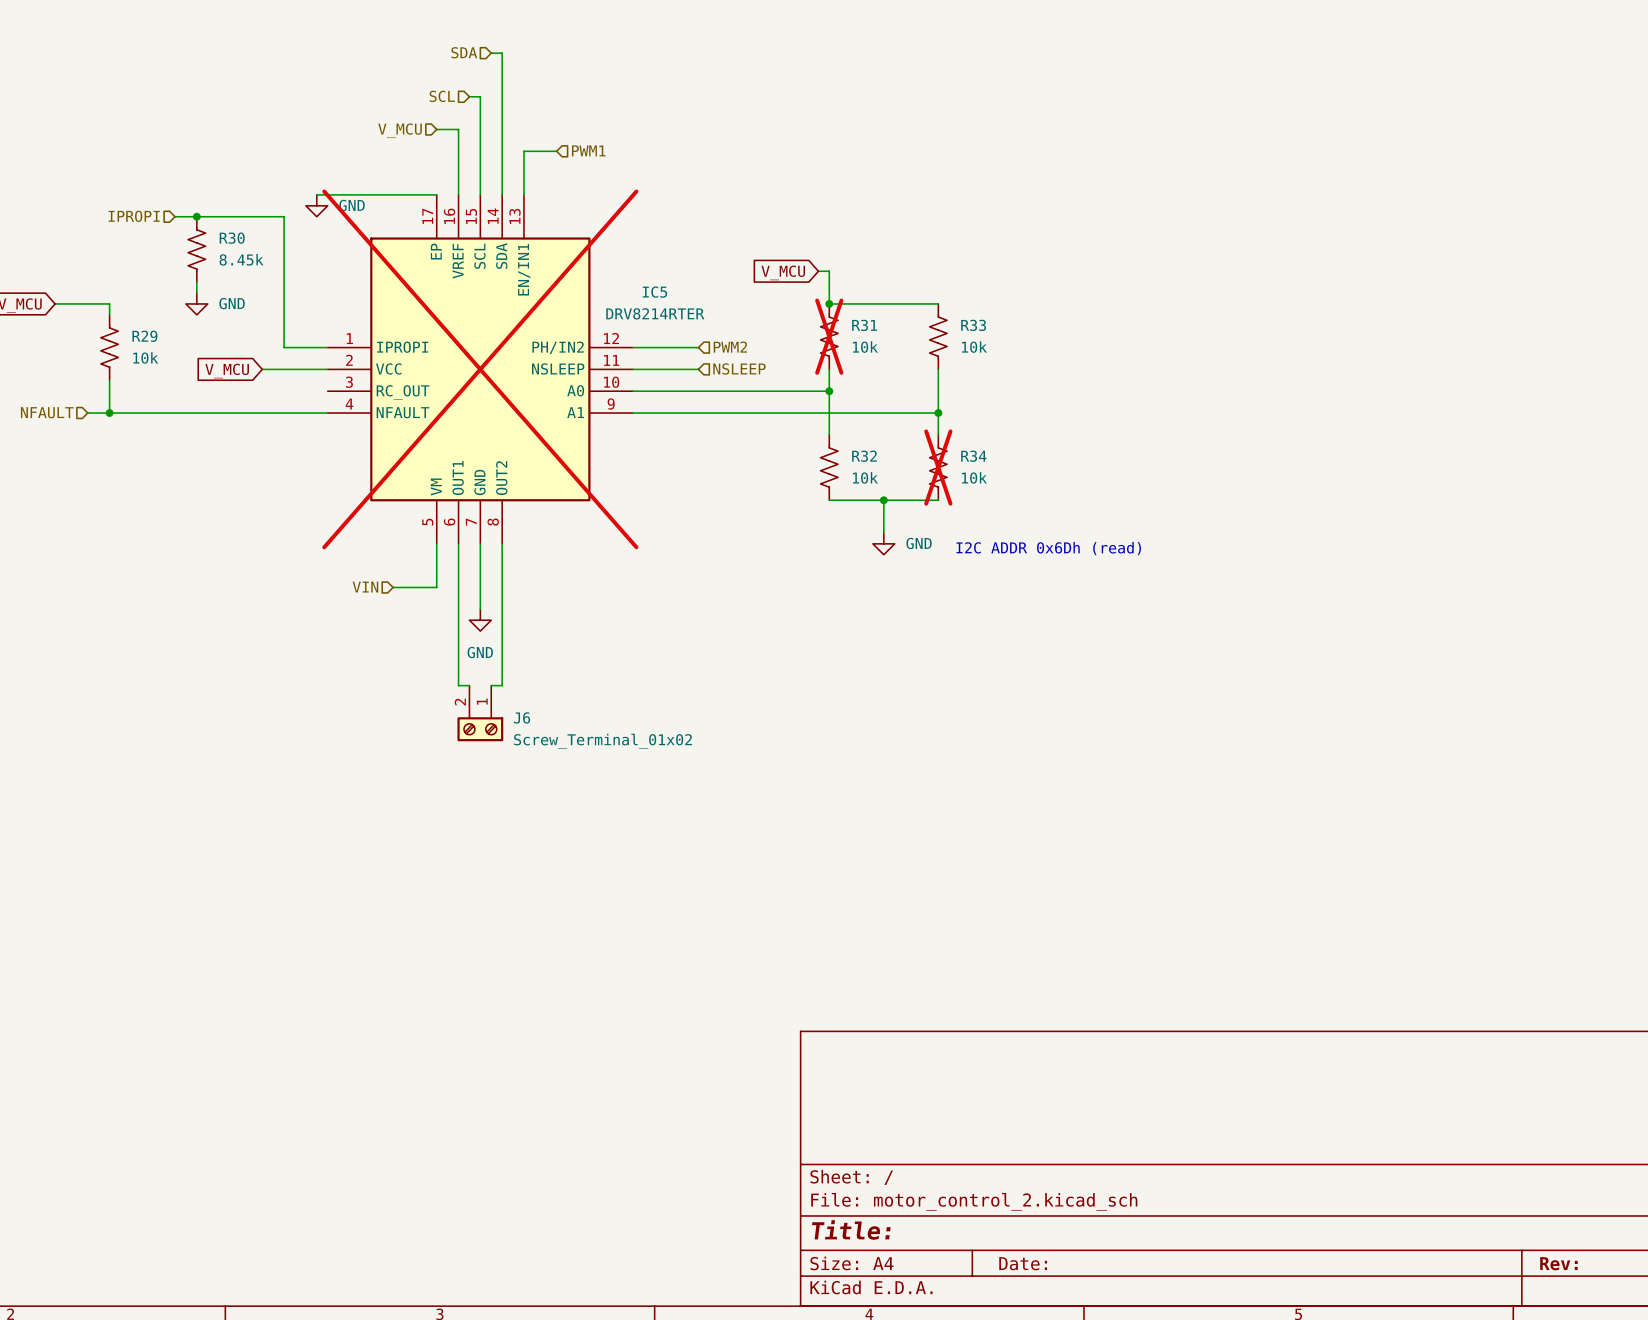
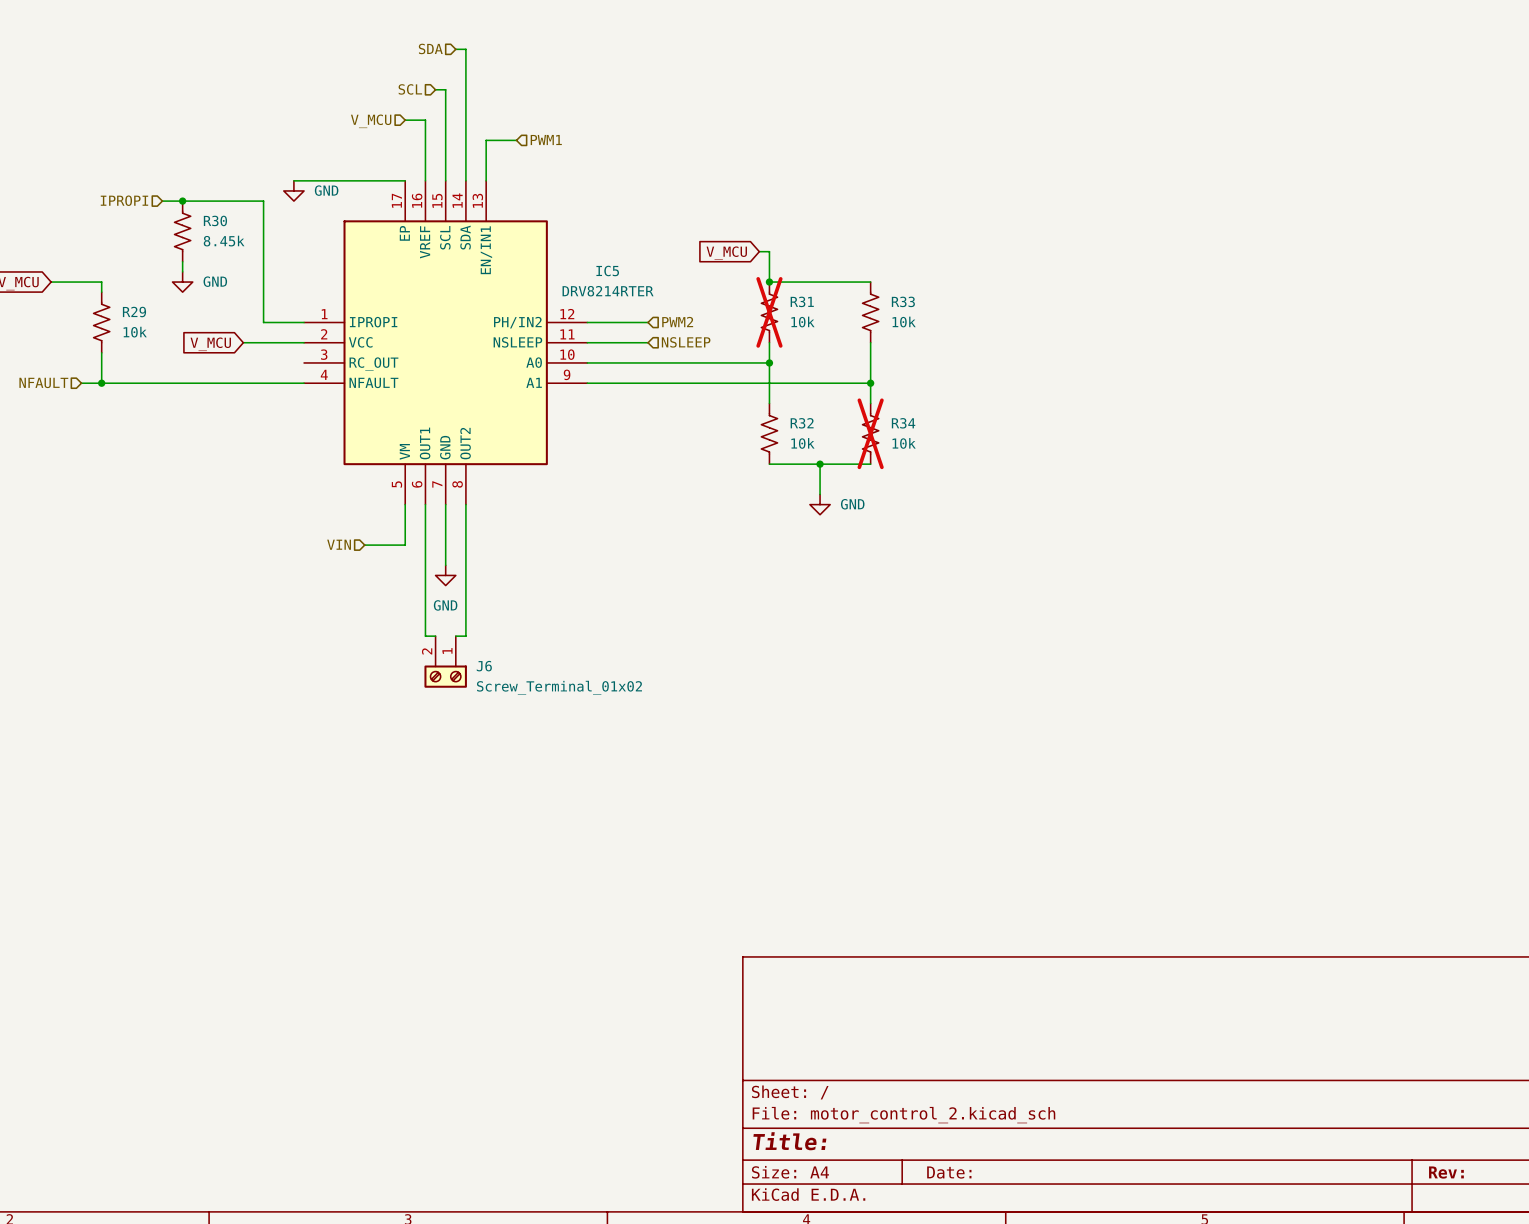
IC5 do-not-place cross: (480, 369) -> none
text: I2C ADDR 0x6Dh (read) (1048, 548) -> none

